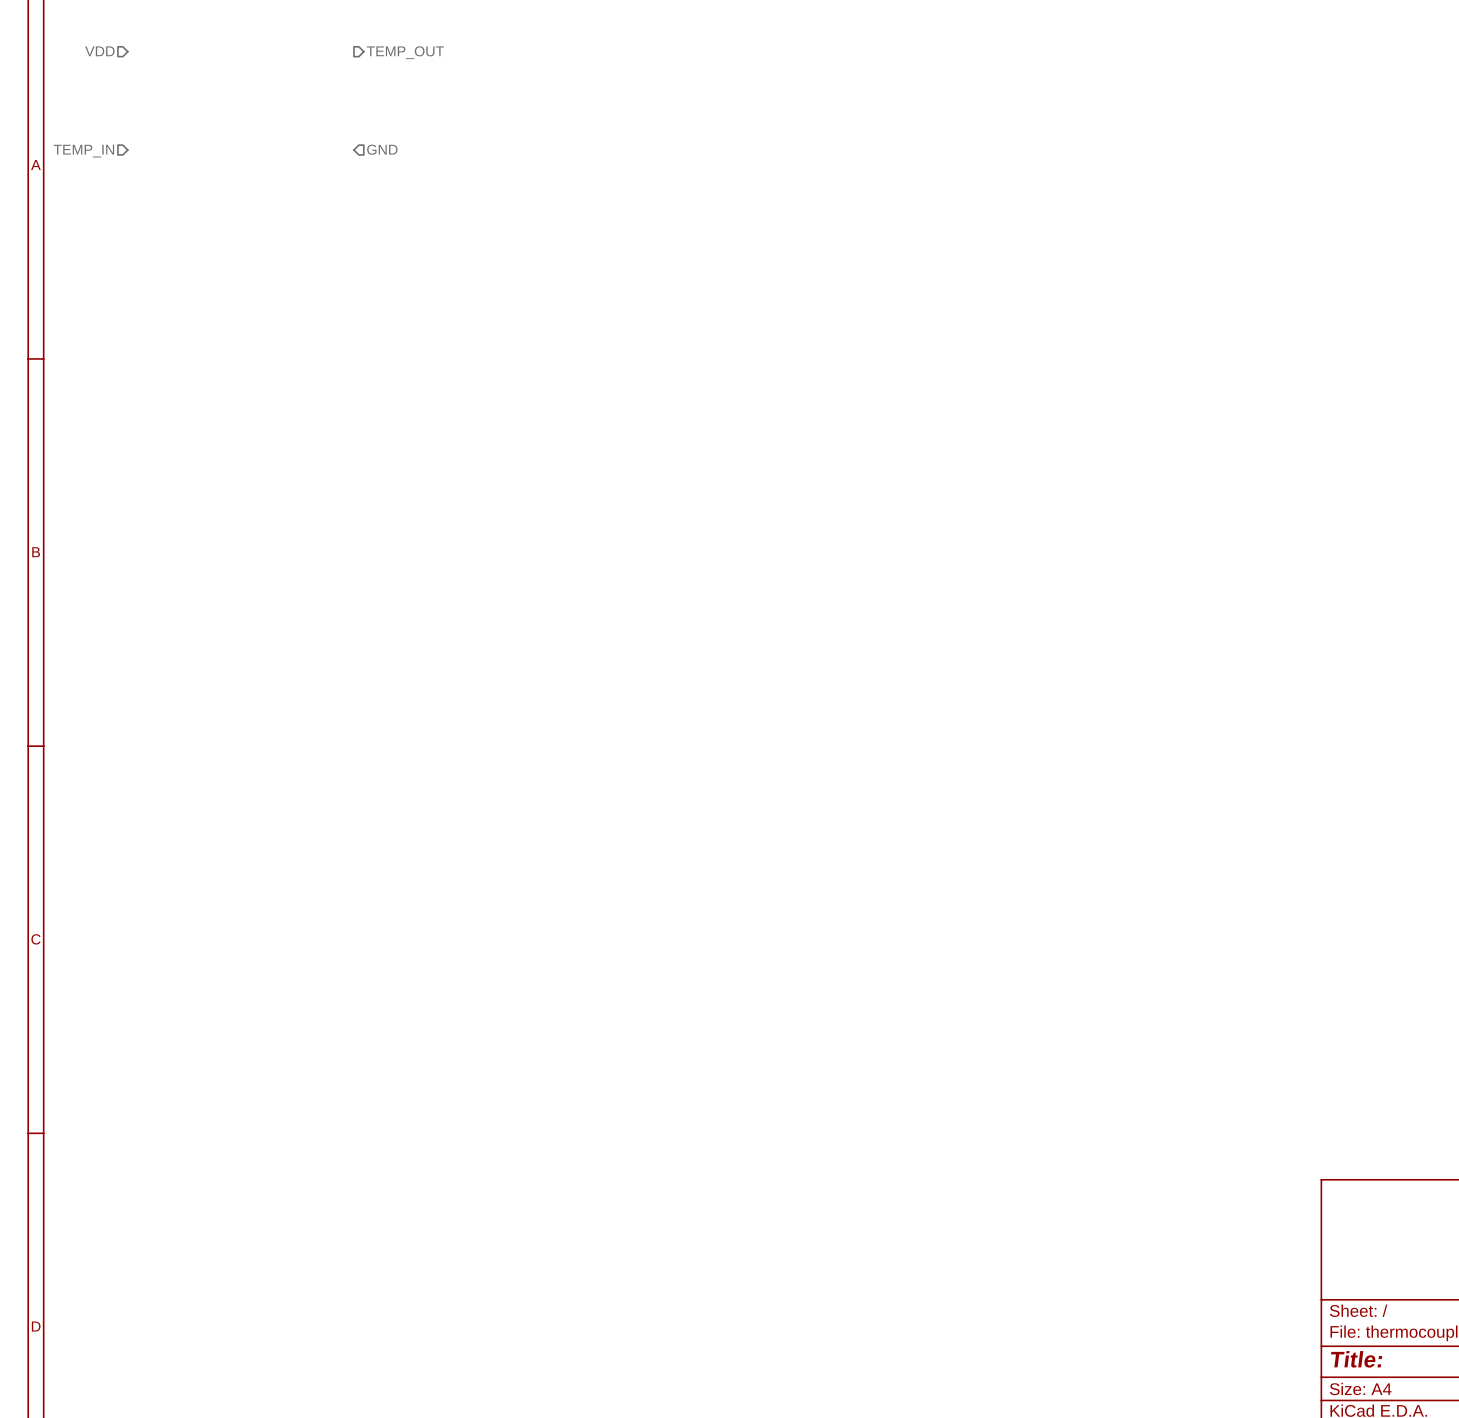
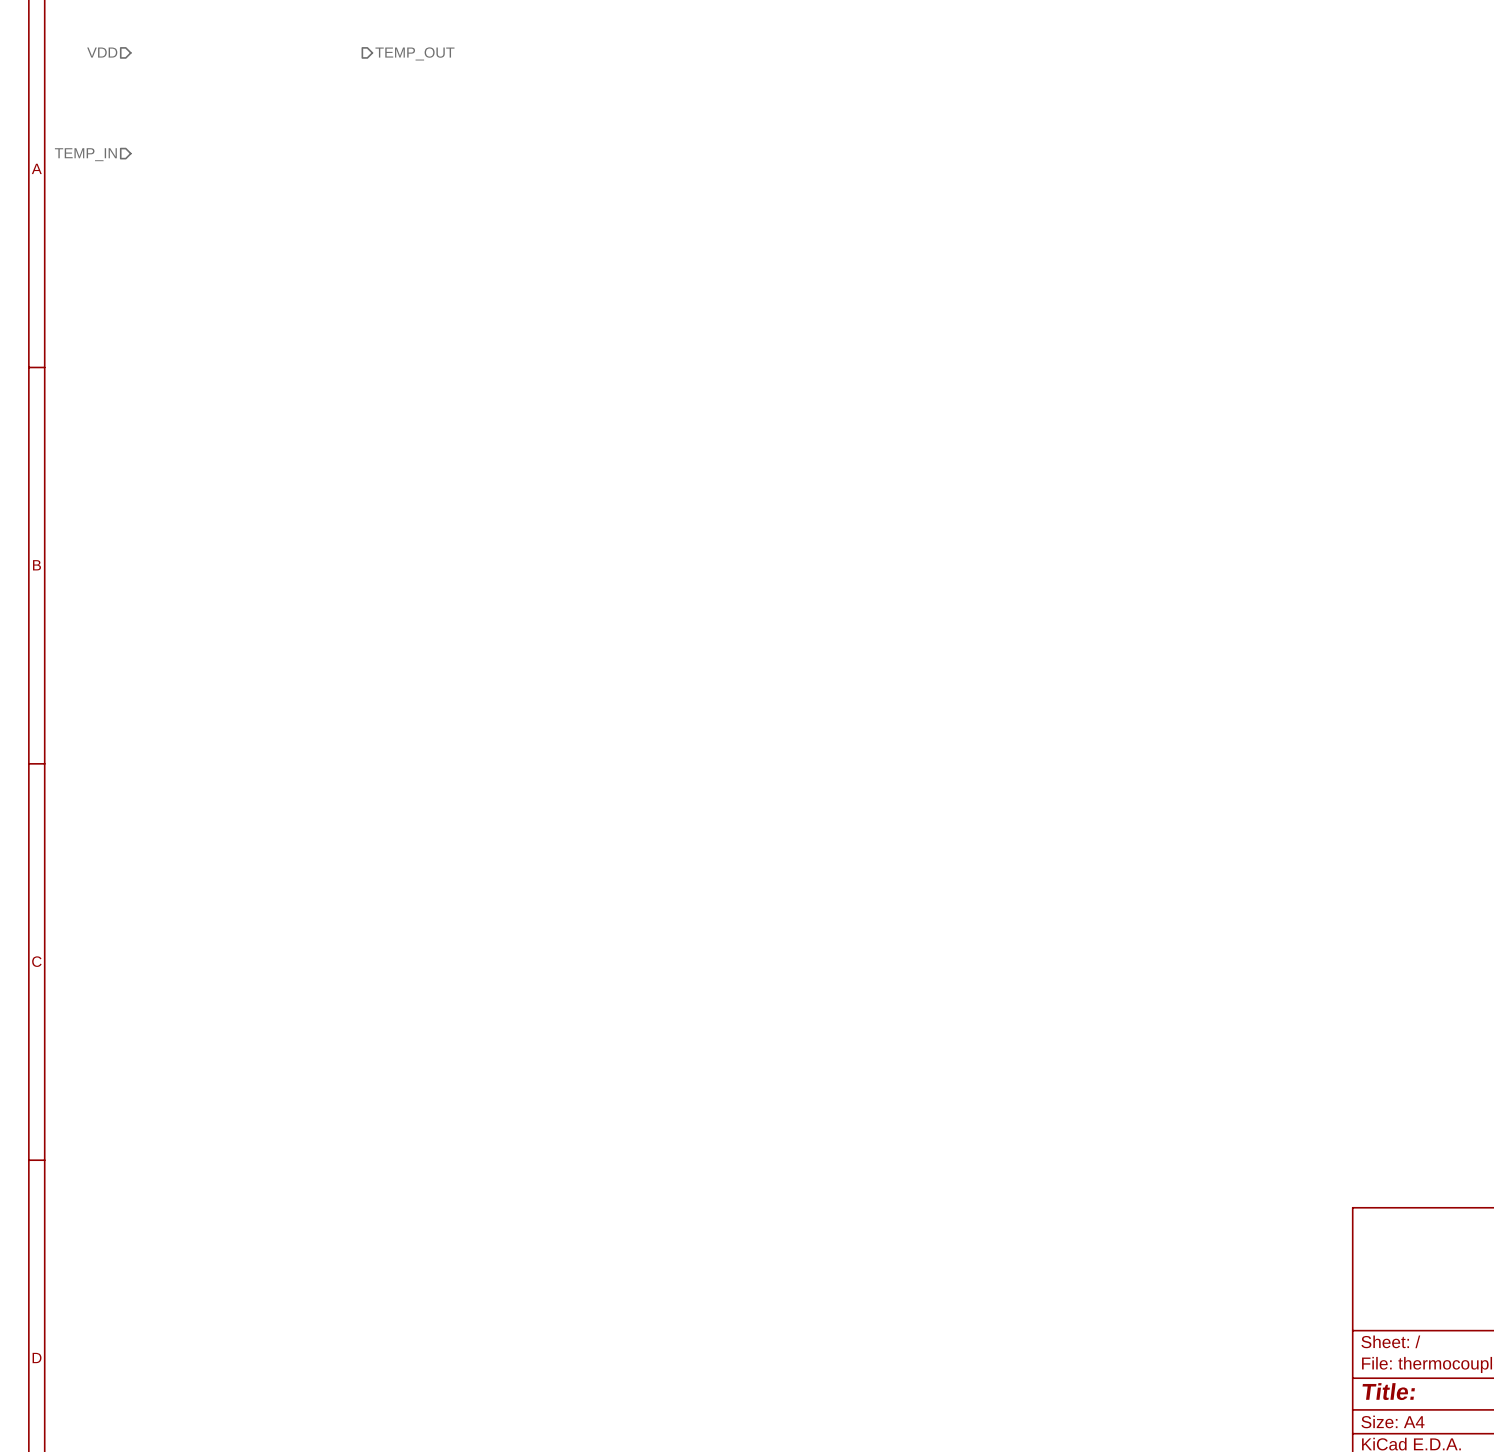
hierarchical label: GND (382, 149) -> none

